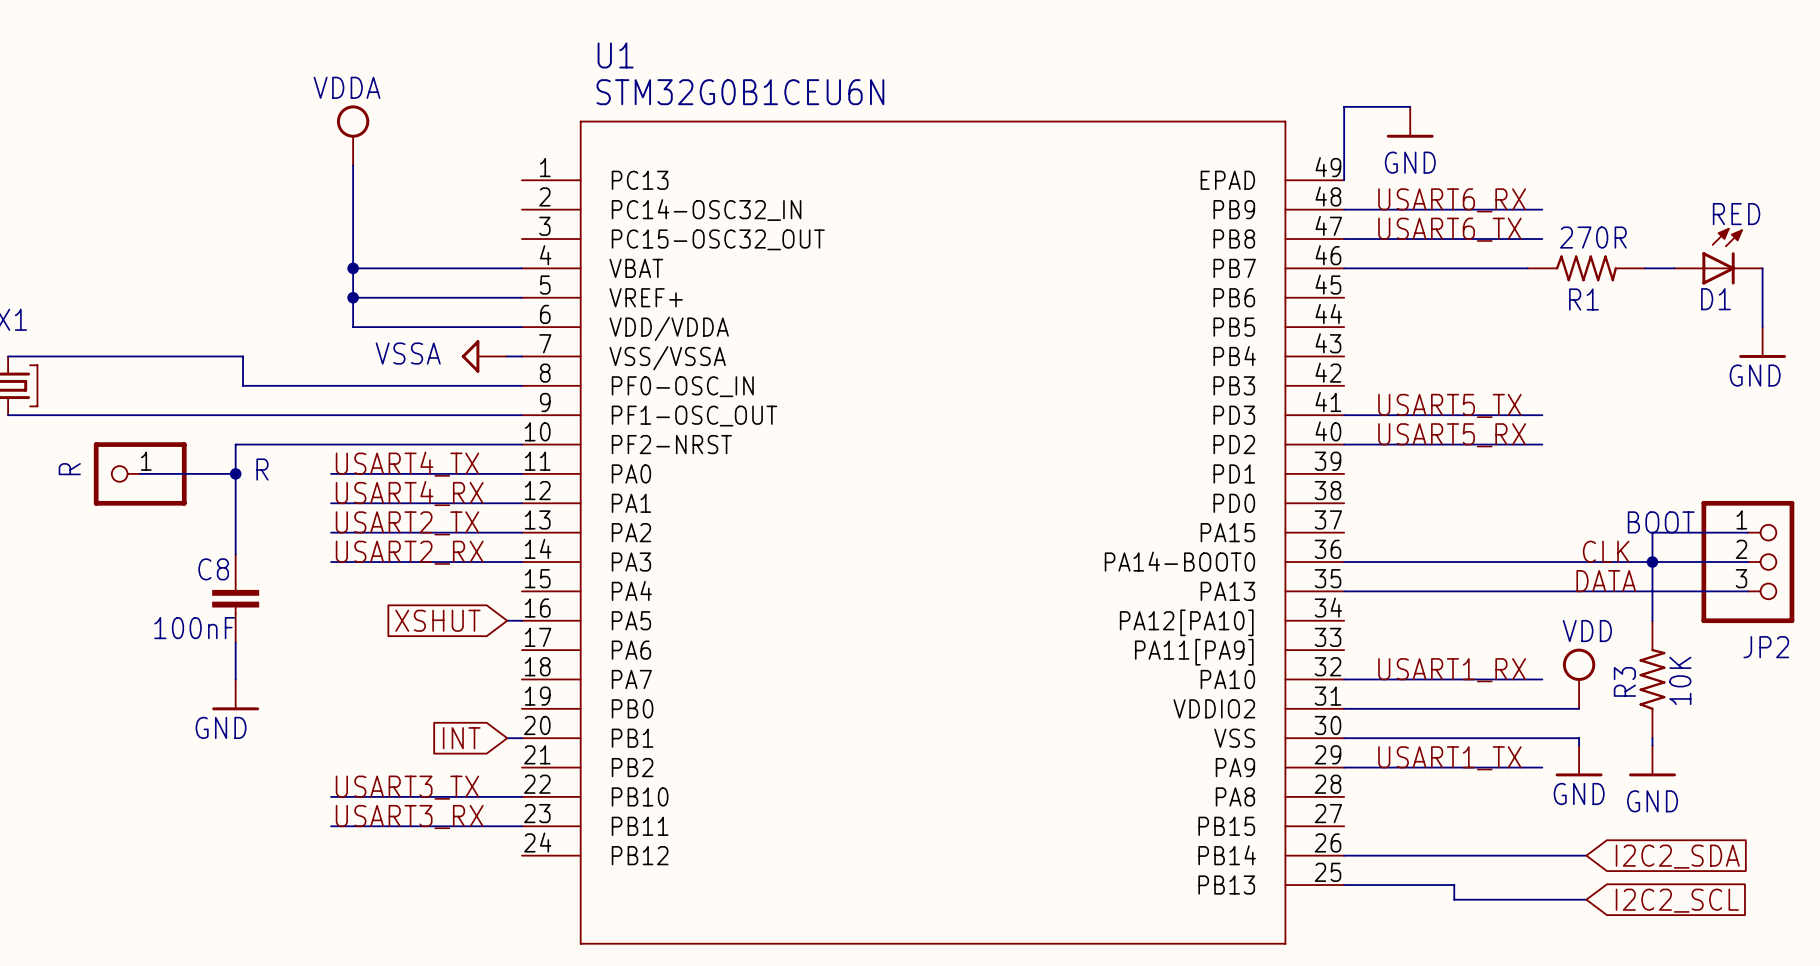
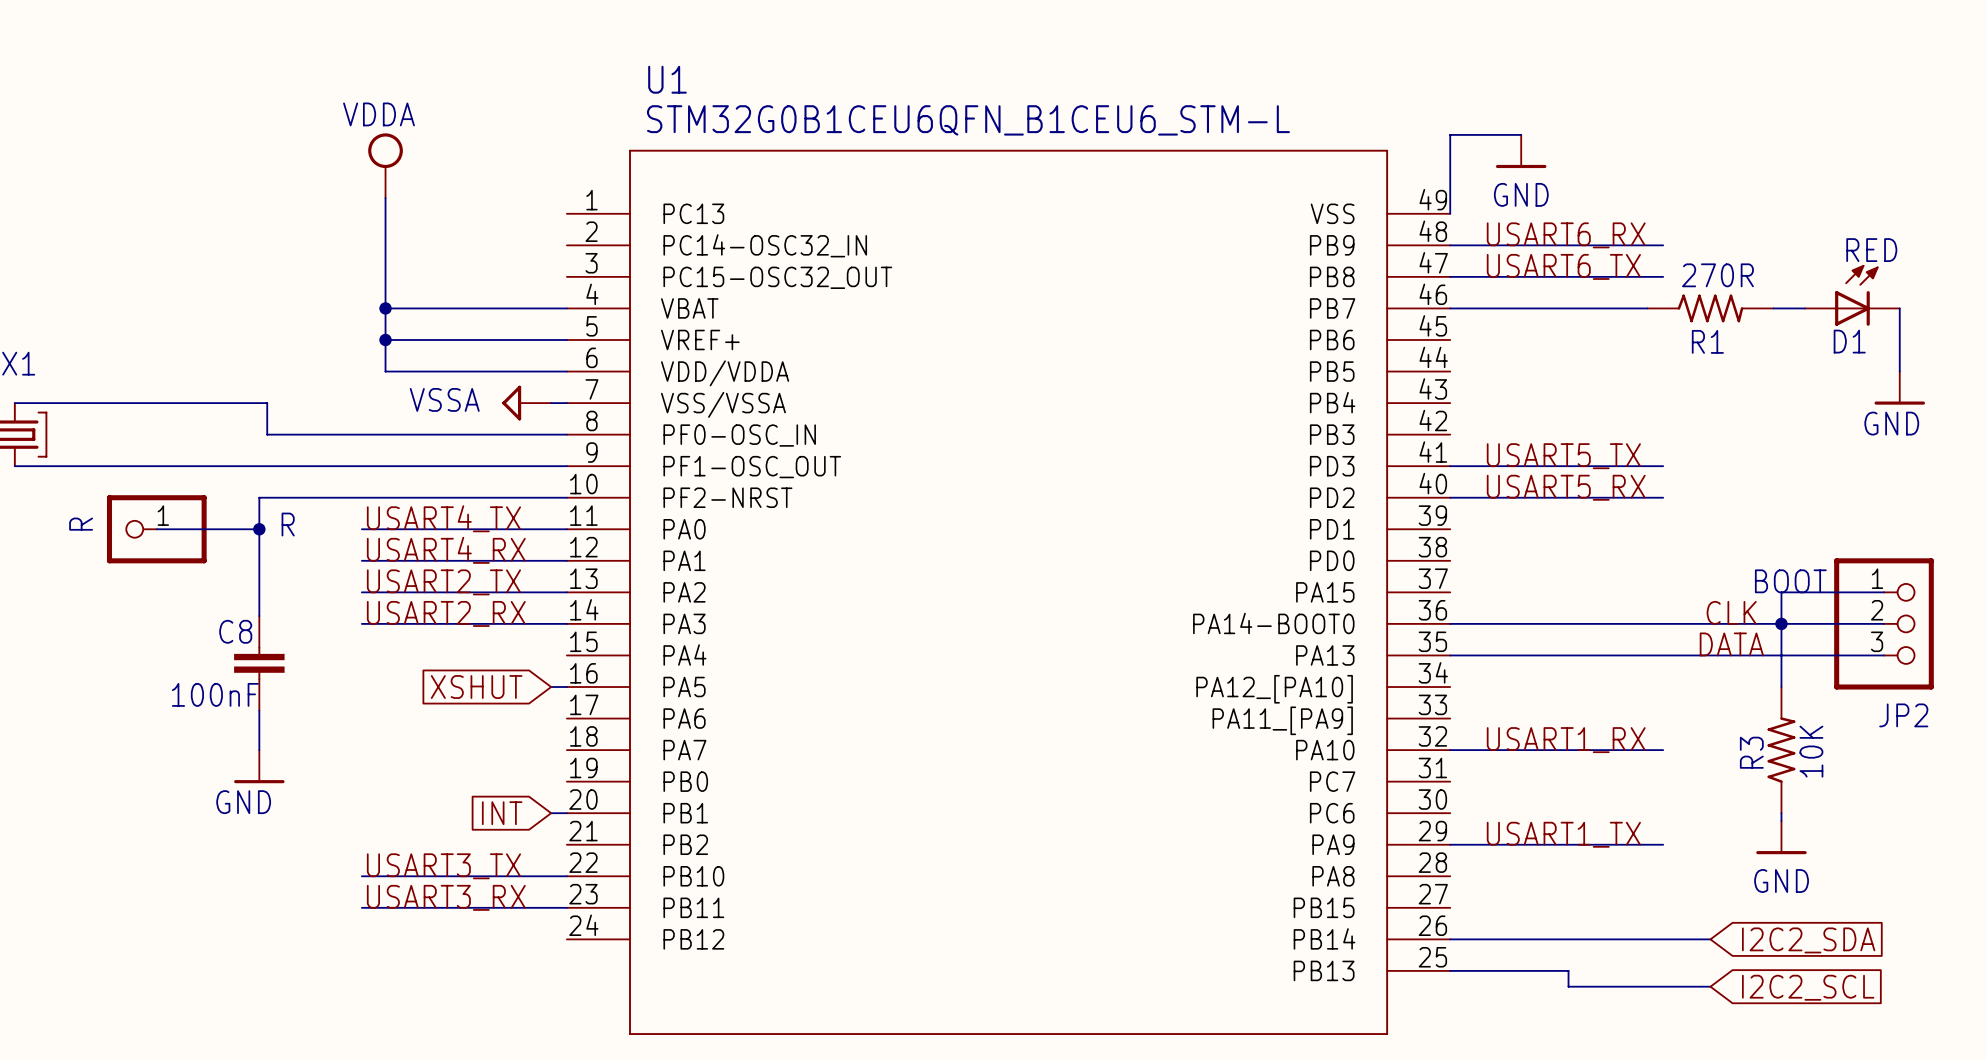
U1 value: STM32G0B1CEU6N (740, 92) -> STM32G0B1CEU6QFN_B1CEU6_STM-L (968, 120)
U1 pin name: EPAD (1227, 180) -> VSS (1332, 213)
U1 pin name: PA12[PA10] (1186, 622) -> PA12_[PA10] (1274, 689)
U1 pin name: PA11[PA9] (1194, 652) -> PA11_[PA9] (1282, 720)
power symbol: VDD (1579, 678) -> none
U1 pin name: VDDIO2 (1214, 708) -> PC7 (1332, 781)
wire: (1344, 708) (1579, 708) -> none
U1 pin name: VSS (1234, 738) -> PC6 (1332, 813)
wire: (1344, 738) (1579, 738) (1579, 745) -> none
power symbol: GND (1579, 760) -> none

